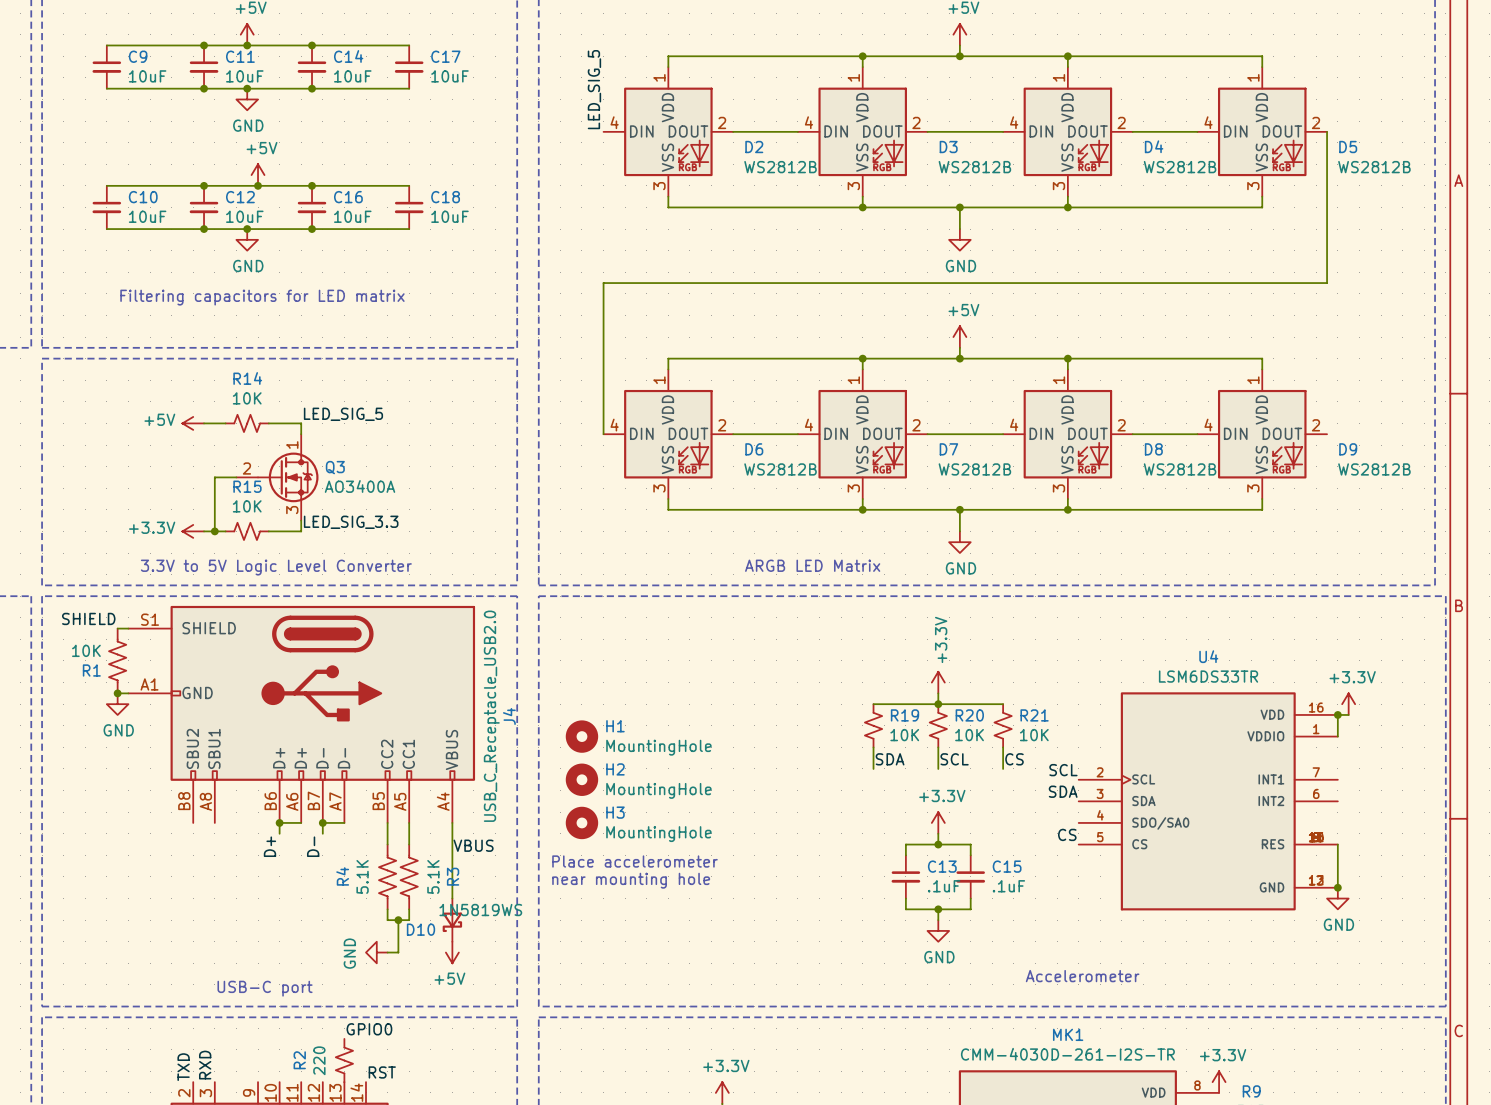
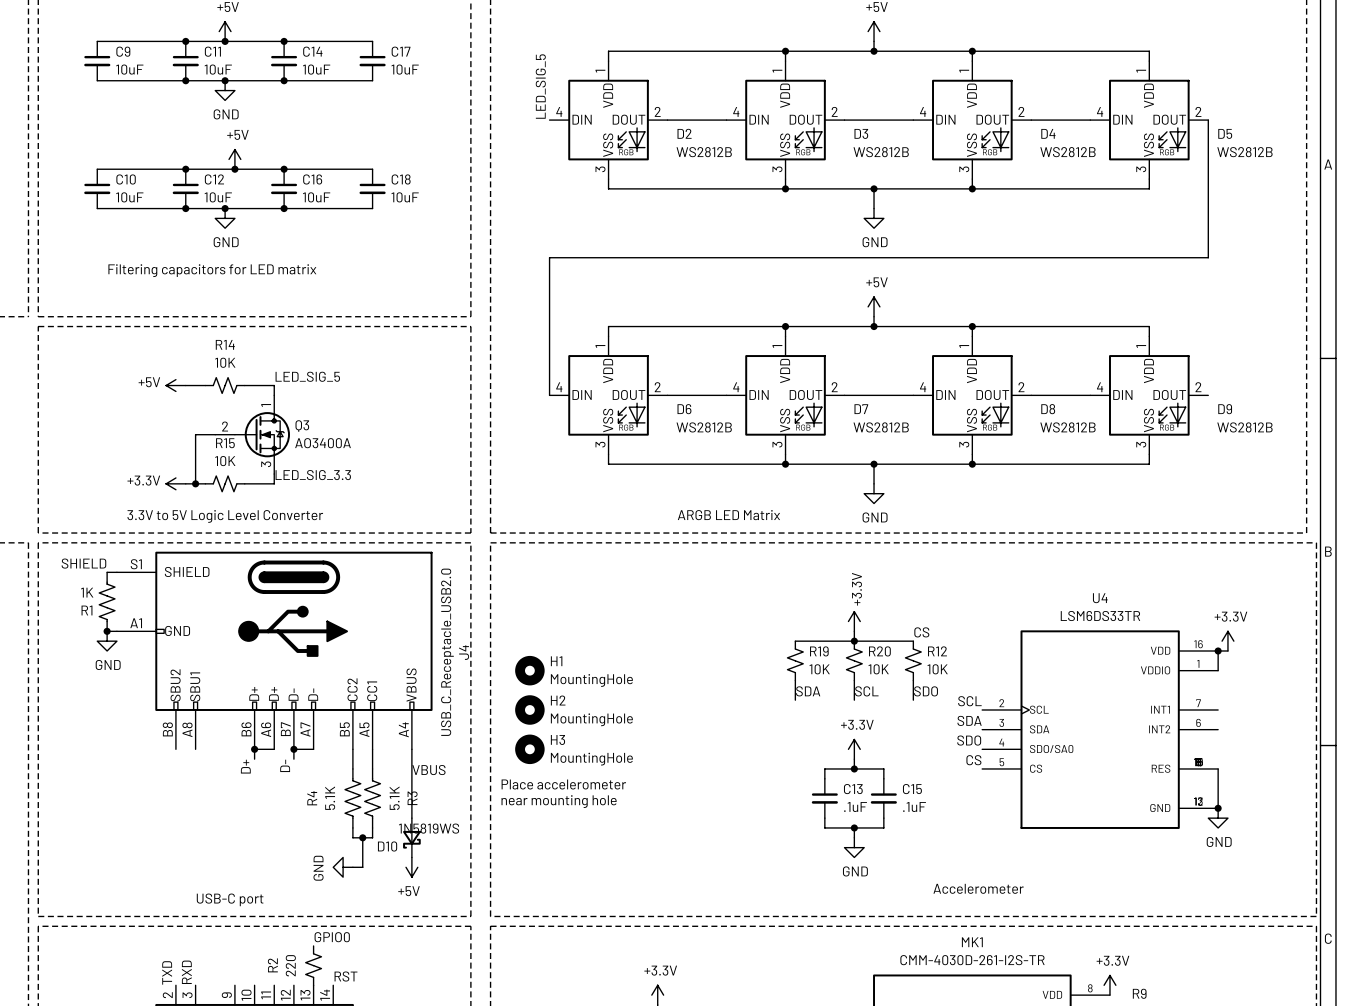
R1 value: 10K (86, 650) -> 1K (87, 592)
label: none -> CS (921, 632)
R21 name: R21 (1034, 715) -> R12 (937, 651)
label: CS (1014, 759) -> SDO (926, 691)
label: none -> SDO (969, 740)

